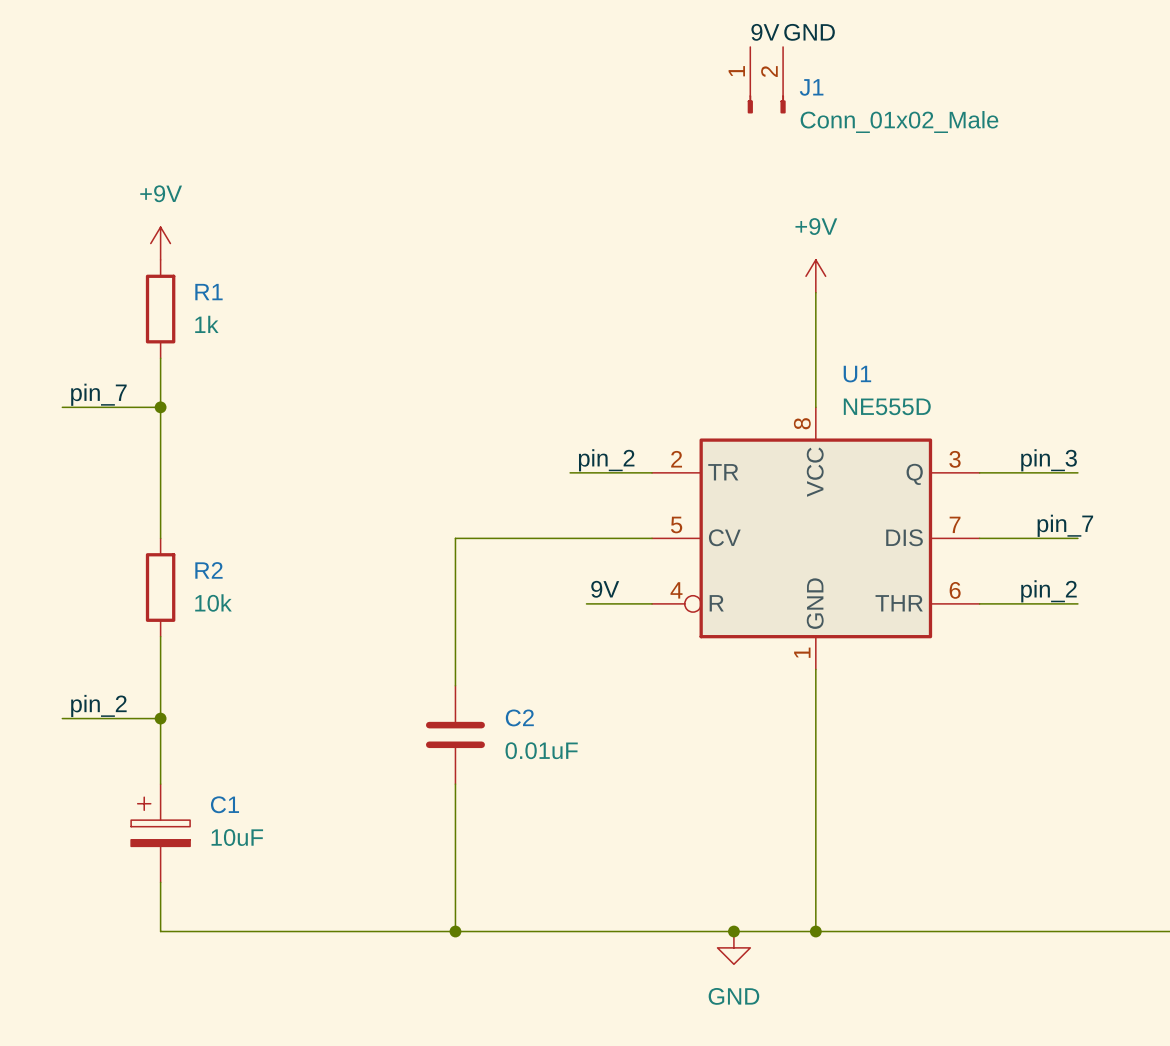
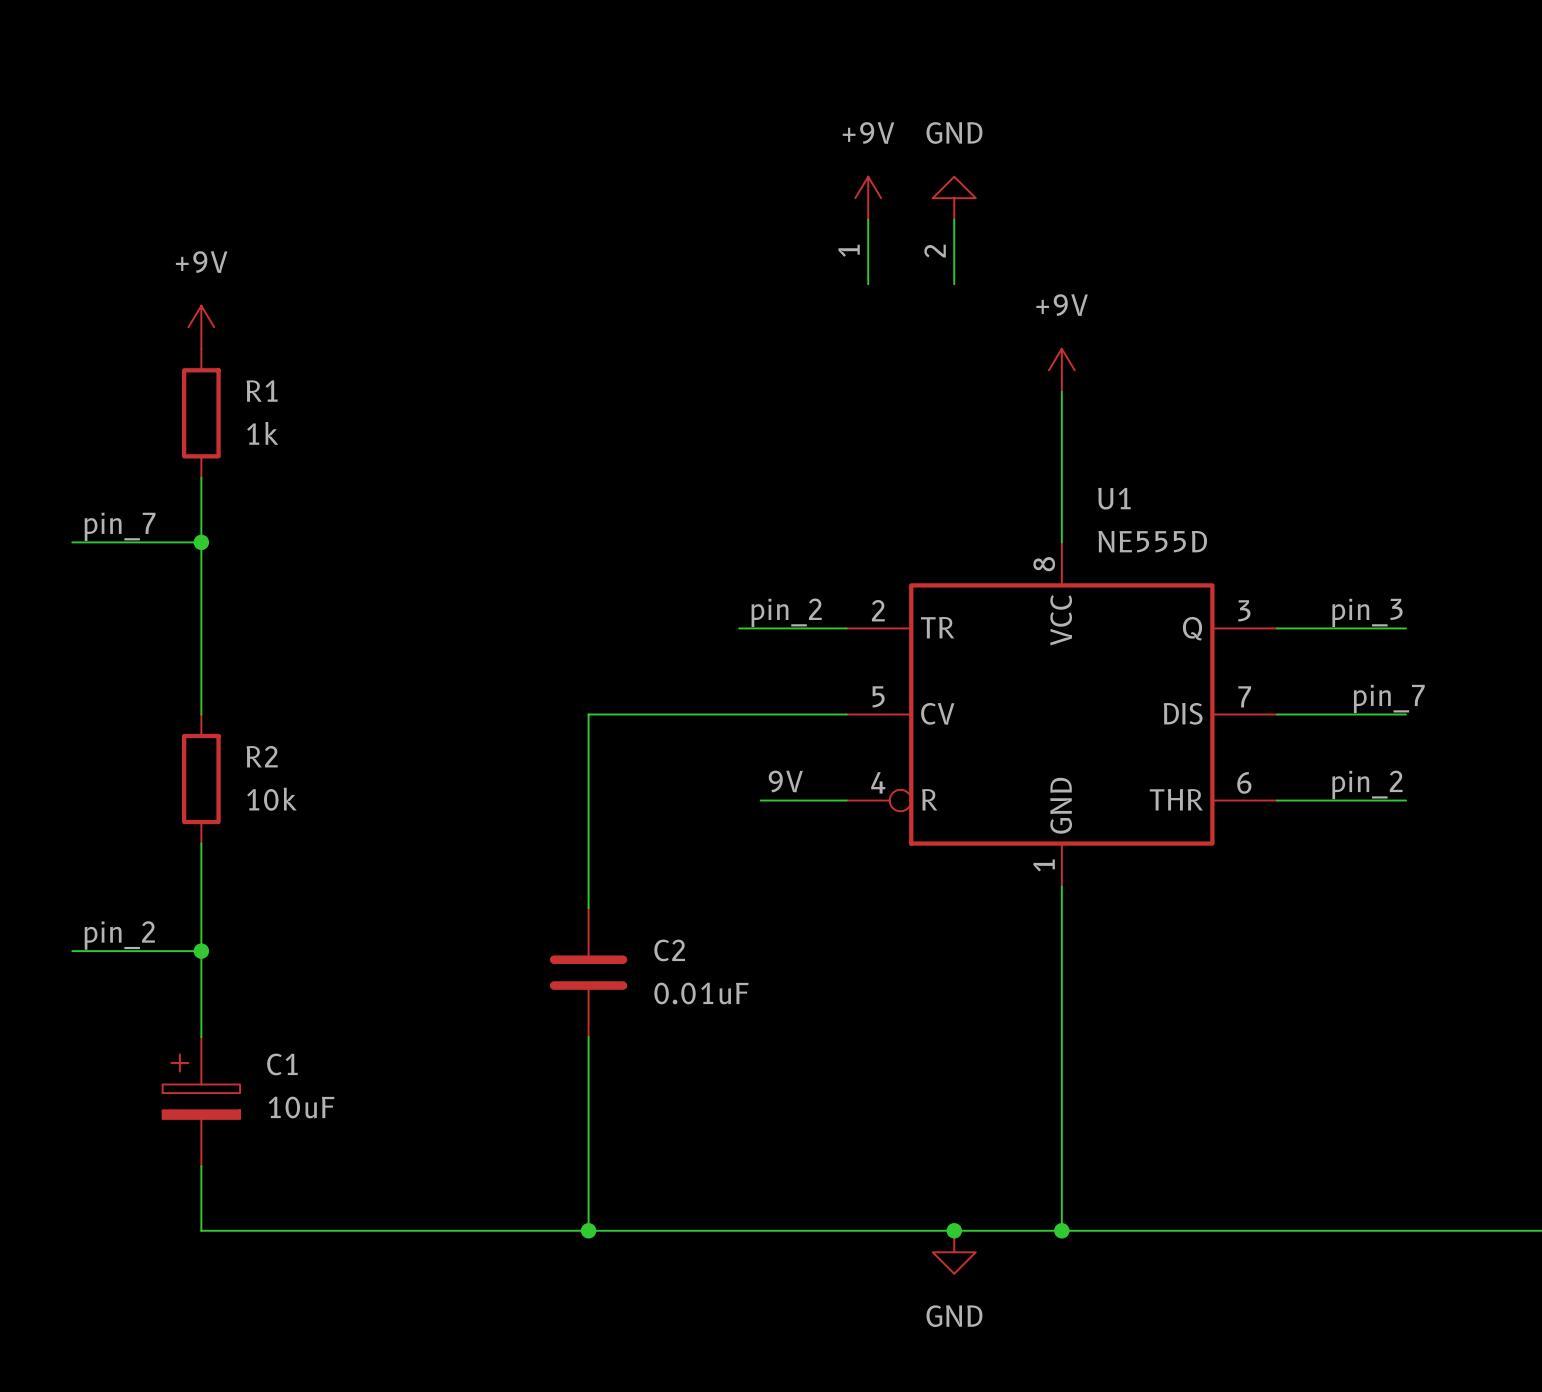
label: 9V (765, 32) -> none
label: GND (809, 32) -> none
J1: Conn_01x02_Male (766, 80) -> none
power symbol: none -> +9V (868, 198)
power symbol: none -> GND (954, 198)
wire: none -> (868, 219) (868, 284)
wire: none -> (954, 219) (954, 284)
label: none -> 1 (849, 250)
label: none -> 2 (935, 251)

